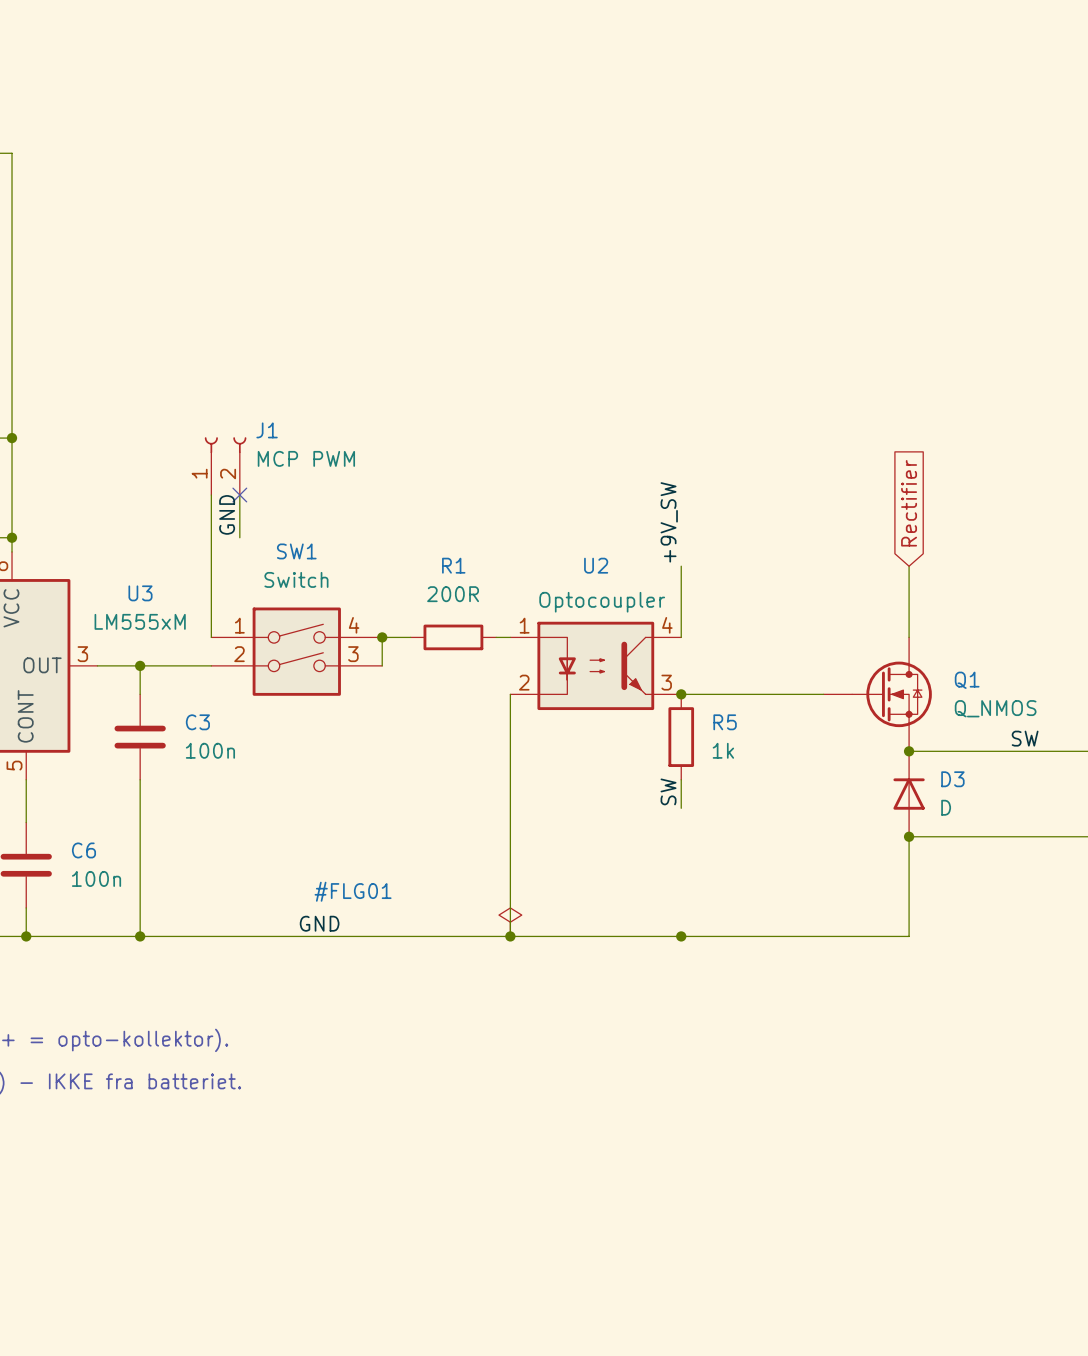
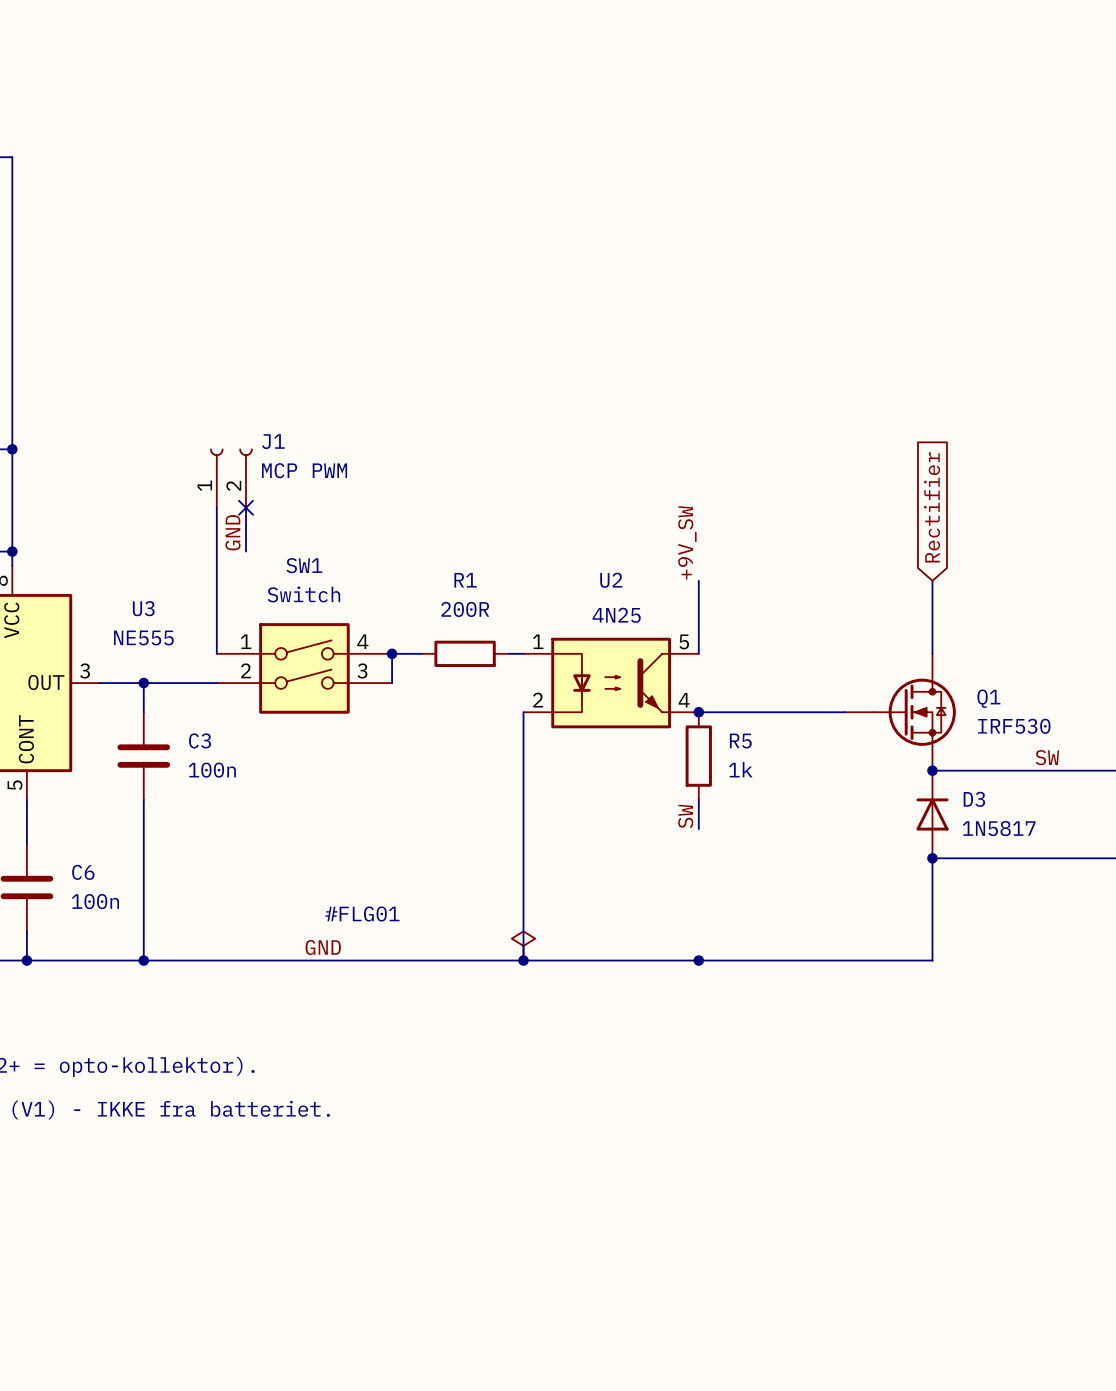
U2 value: Optocoupler (602, 602) -> 4N25 (616, 615)
U3 value: LM555xM (140, 621) -> NE555 (143, 637)
U2 pin number: 4 (667, 625) -> 5 (684, 641)
U2 pin number: 3 (666, 682) -> 4 (684, 700)
Q1 value: Q_NMOS (995, 708) -> IRF530 (1014, 726)
D3 value: D (946, 807) -> 1N5817 (999, 828)

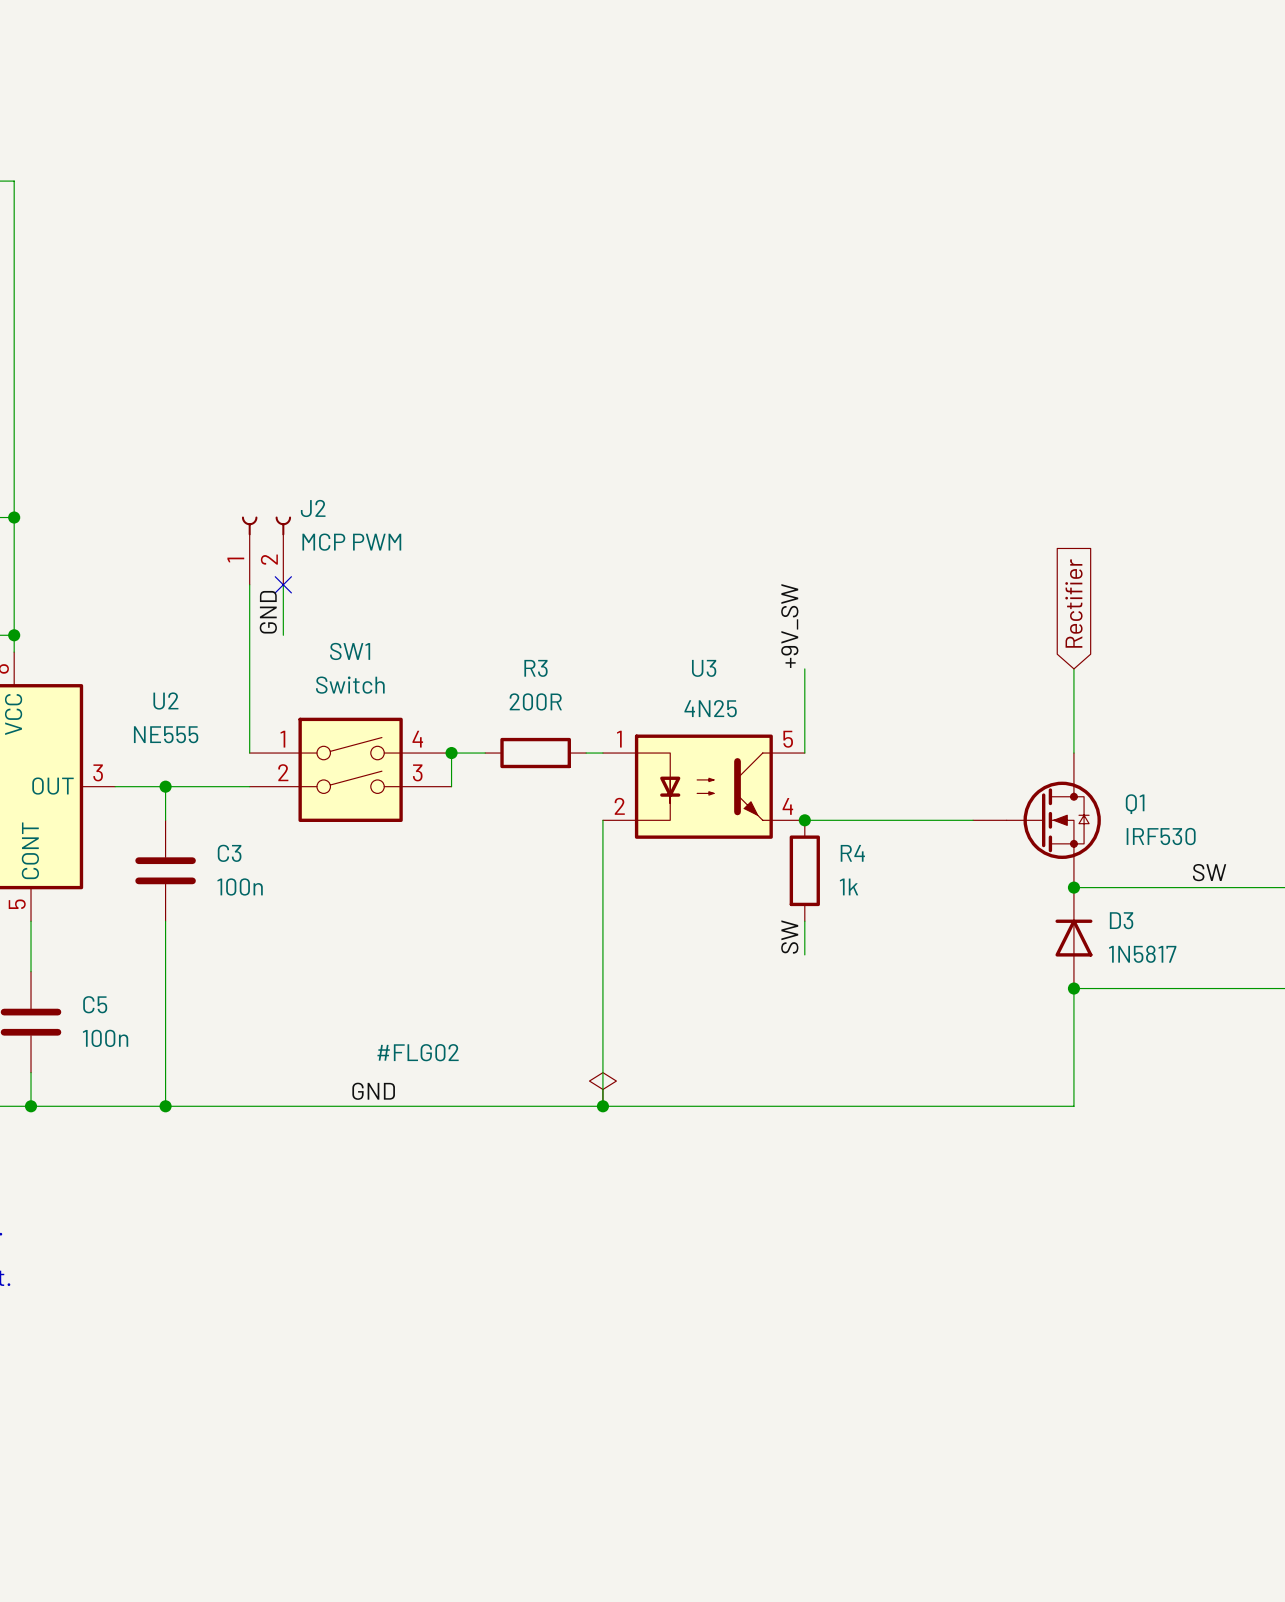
J1 name: J1 (273, 441) -> J2 (313, 508)
R1 name: R1 (465, 580) -> R3 (536, 668)
U2 name: U2 (611, 580) -> U3 (704, 668)
U3 name: U3 (143, 608) -> U2 (165, 701)
R5 name: R5 (740, 741) -> R4 (852, 853)
C6 name: C6 (83, 872) -> C5 (95, 1004)
#FLG01 name: #FLG01 (362, 914) -> #FLG02 (418, 1052)
junction: (698, 960) -> none

